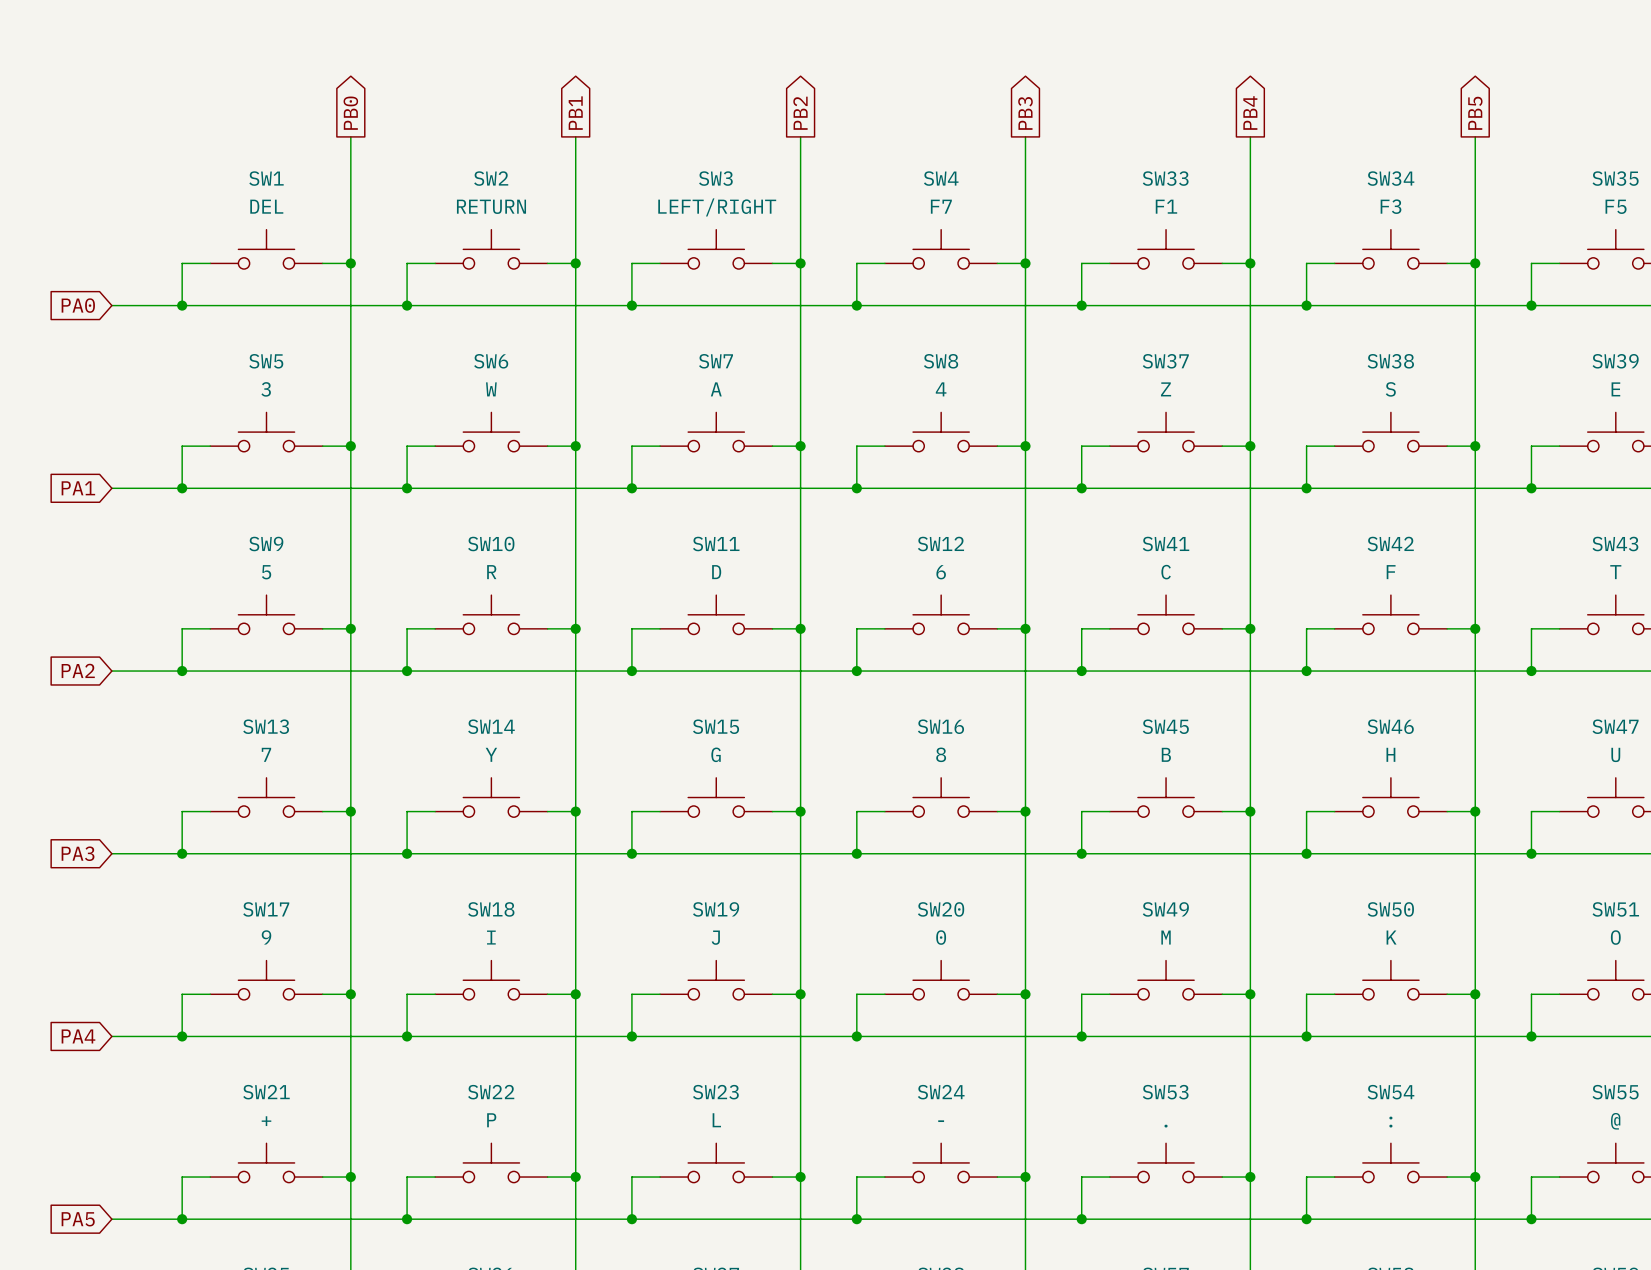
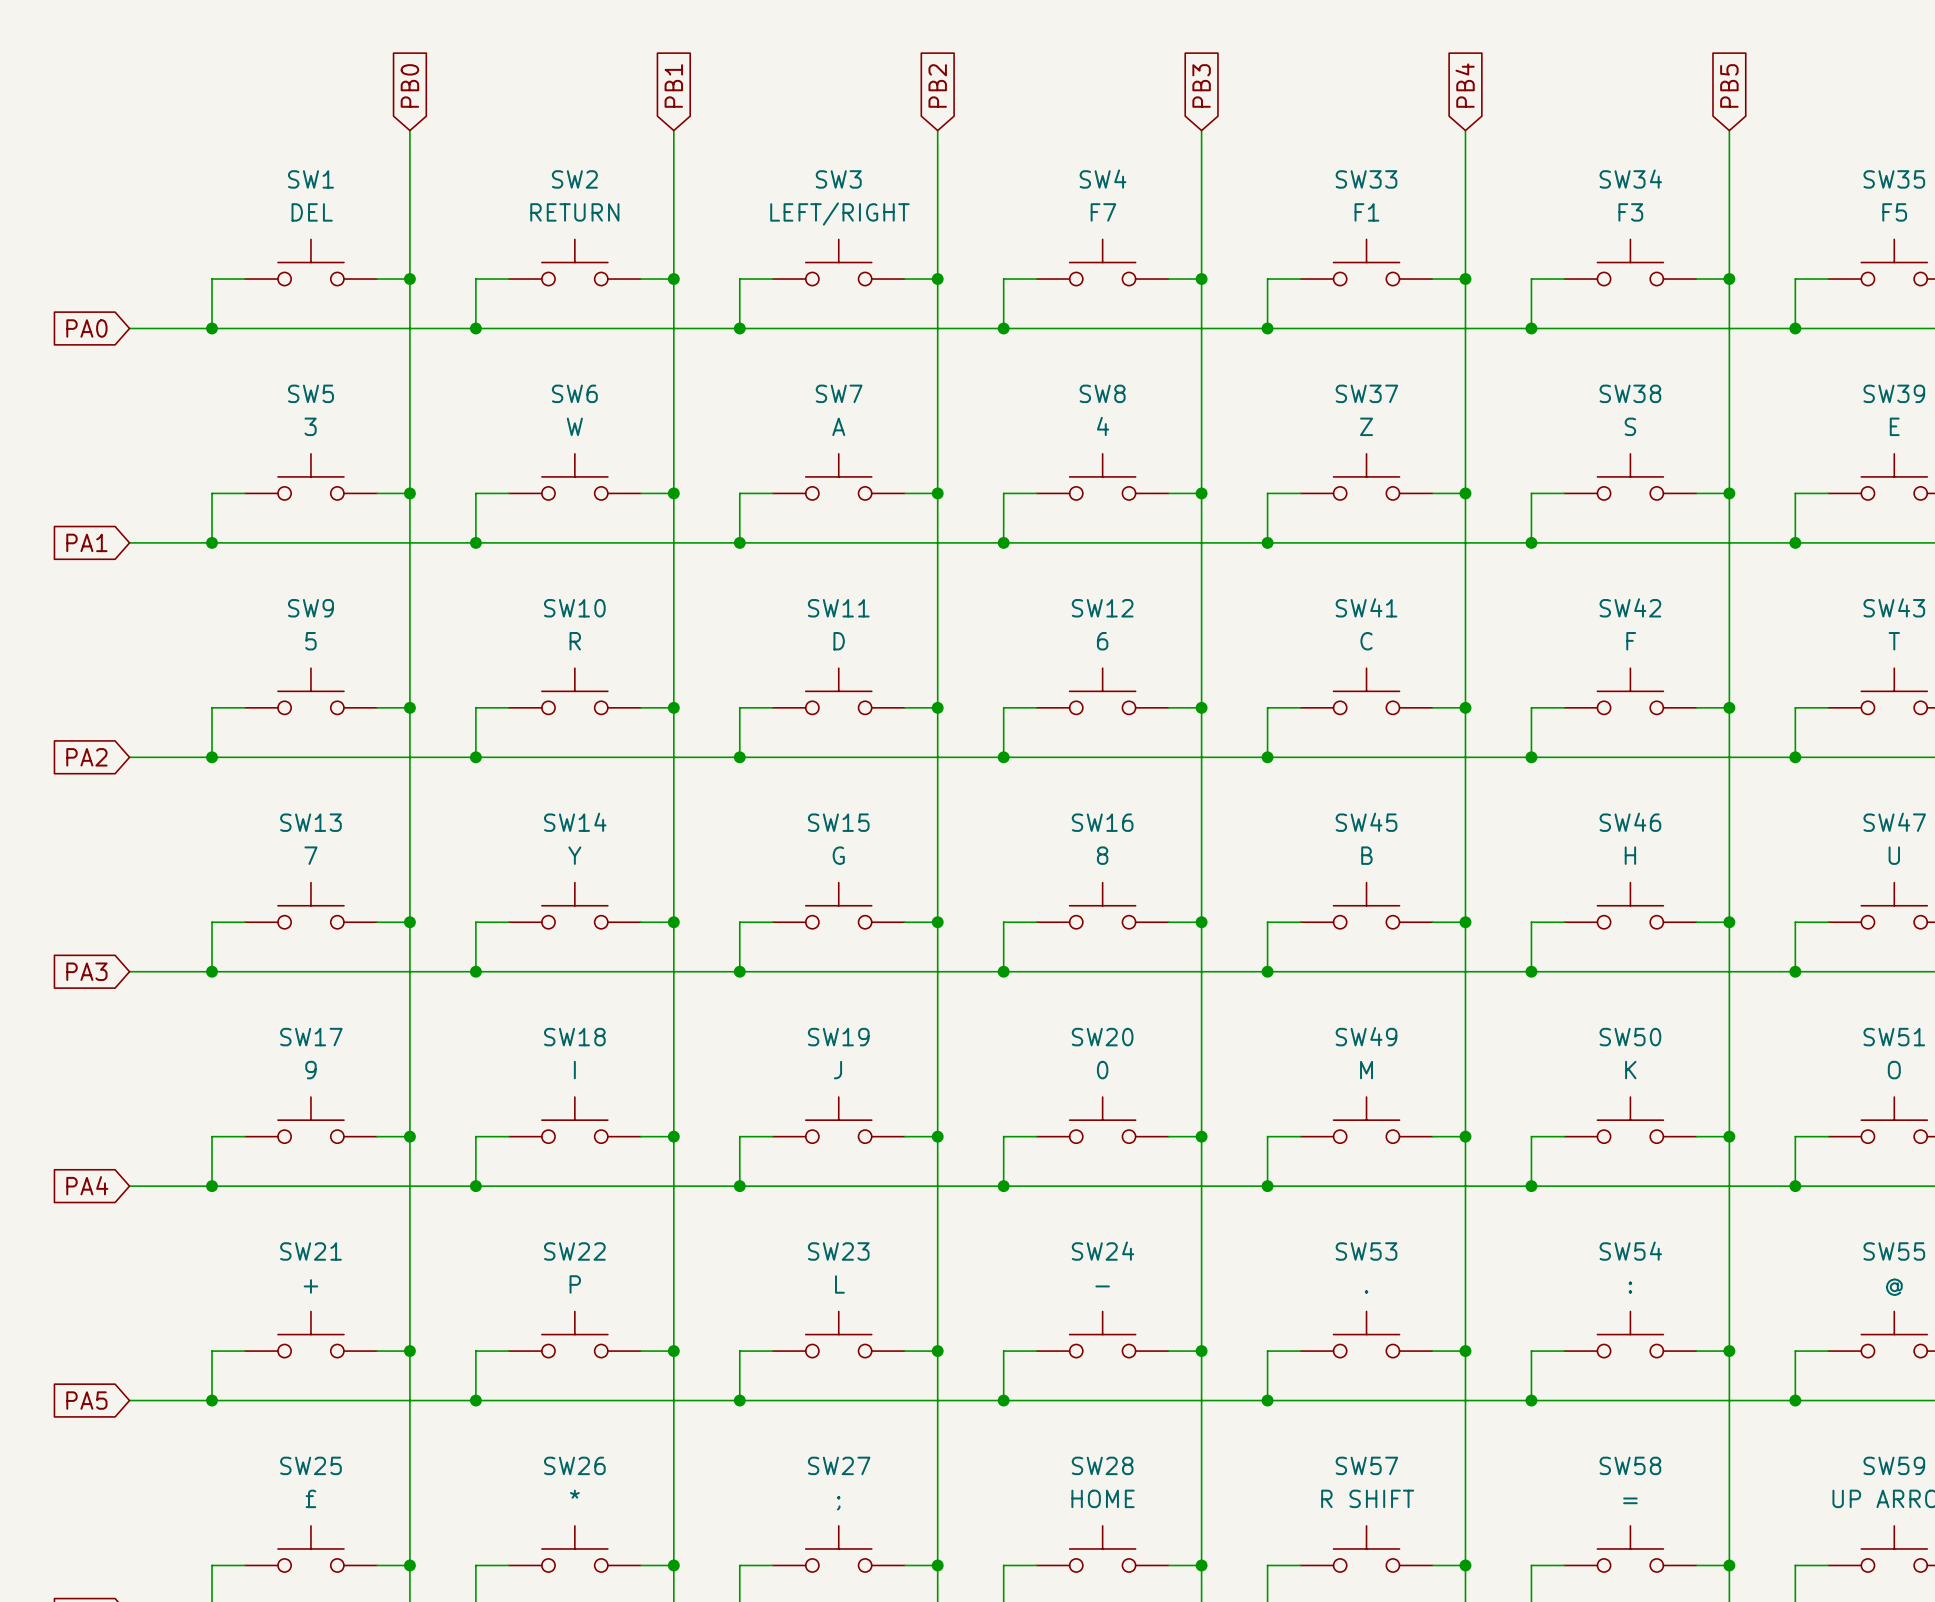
global label shape: output (350, 113) -> input (409, 85)
global label shape: output (575, 113) -> input (673, 85)
global label shape: output (800, 113) -> input (937, 85)
global label shape: output (1025, 113) -> input (1201, 85)
global label shape: output (1250, 113) -> input (1465, 85)
global label shape: output (1475, 113) -> input (1729, 85)

